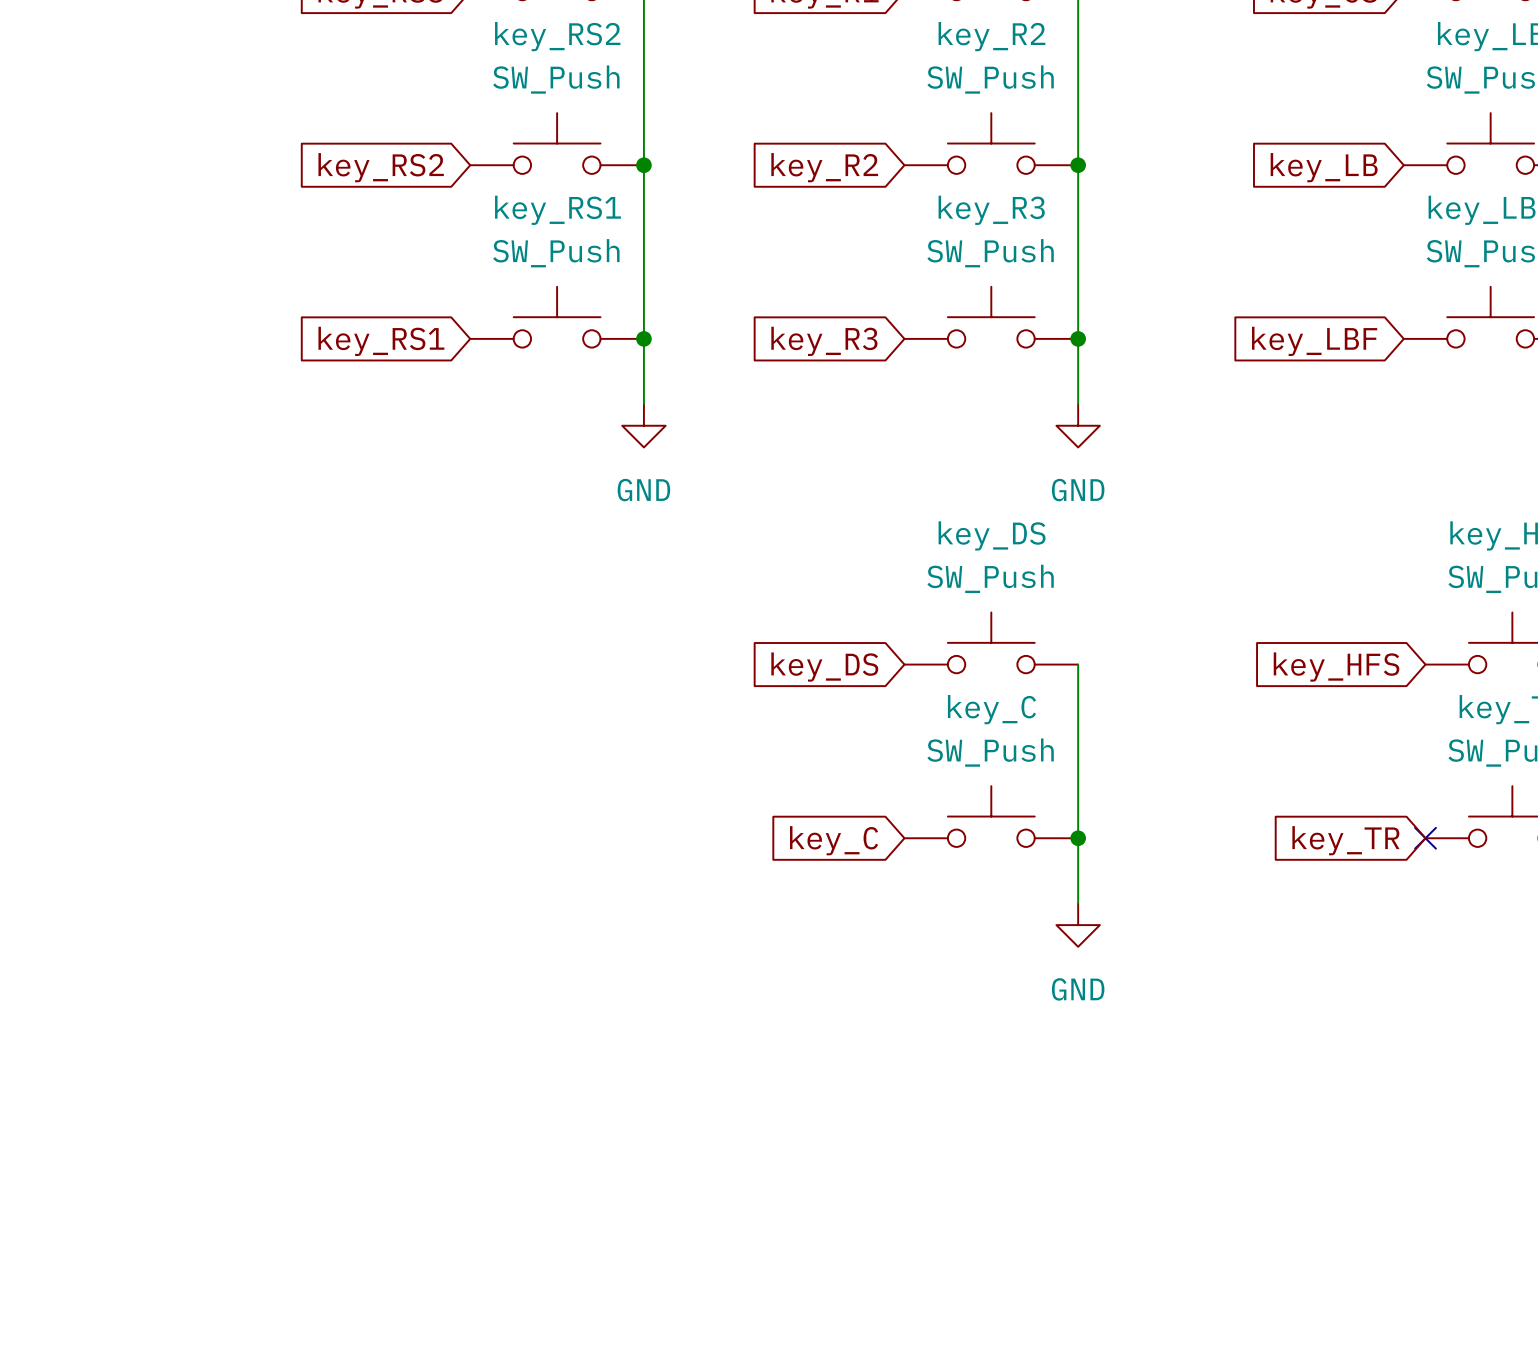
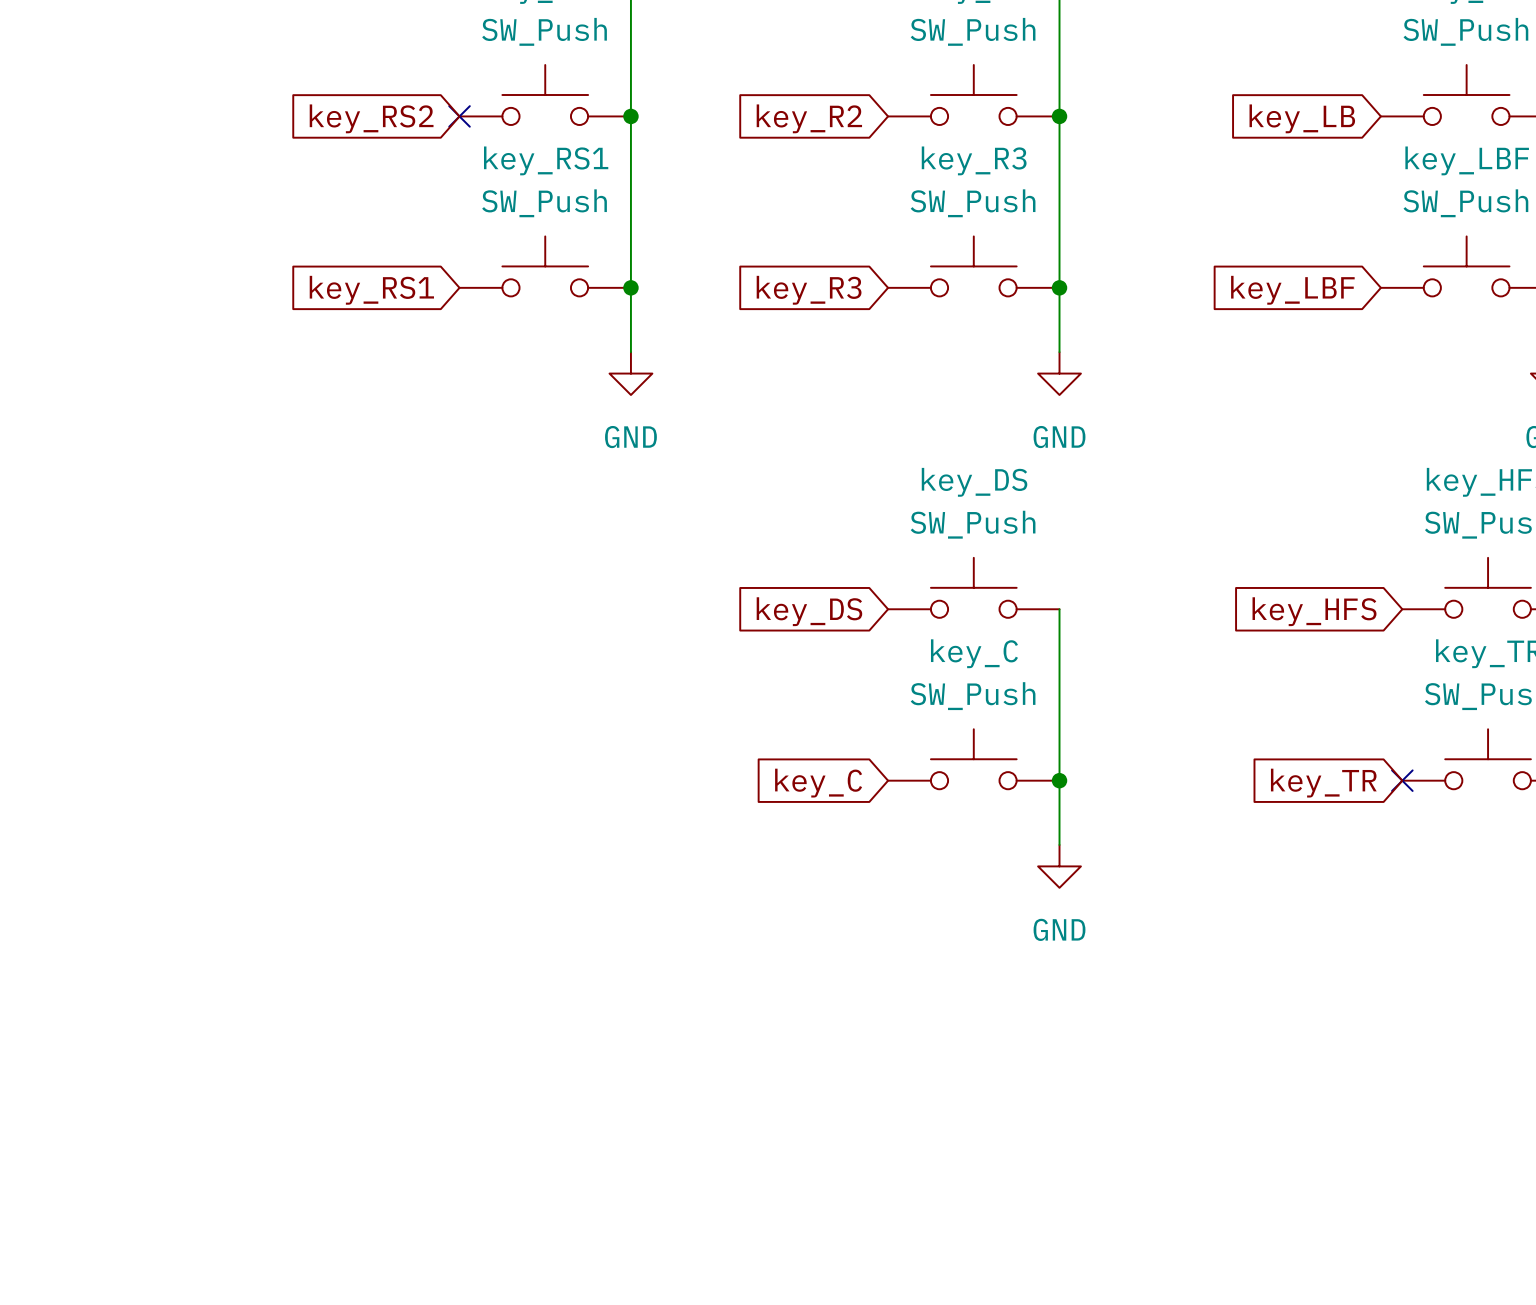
no-connect mark: none -> (459, 116)

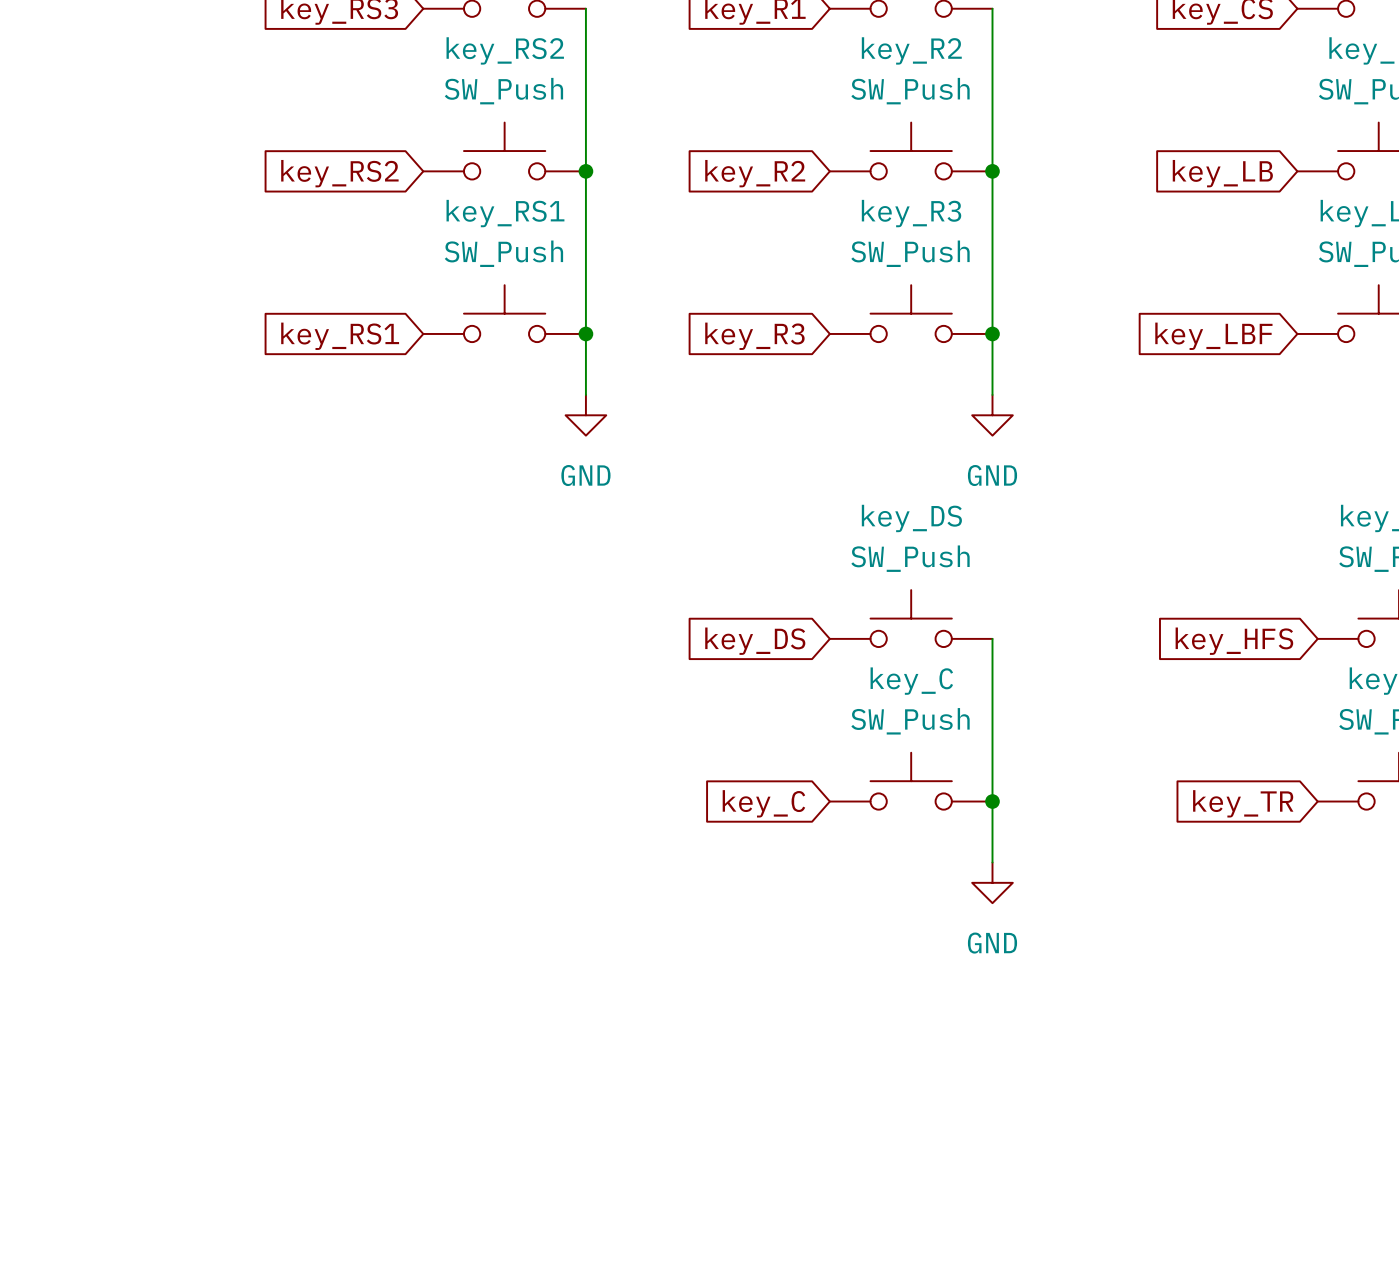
no-connect mark: (459, 116) -> none
no-connect mark: (1402, 780) -> none

